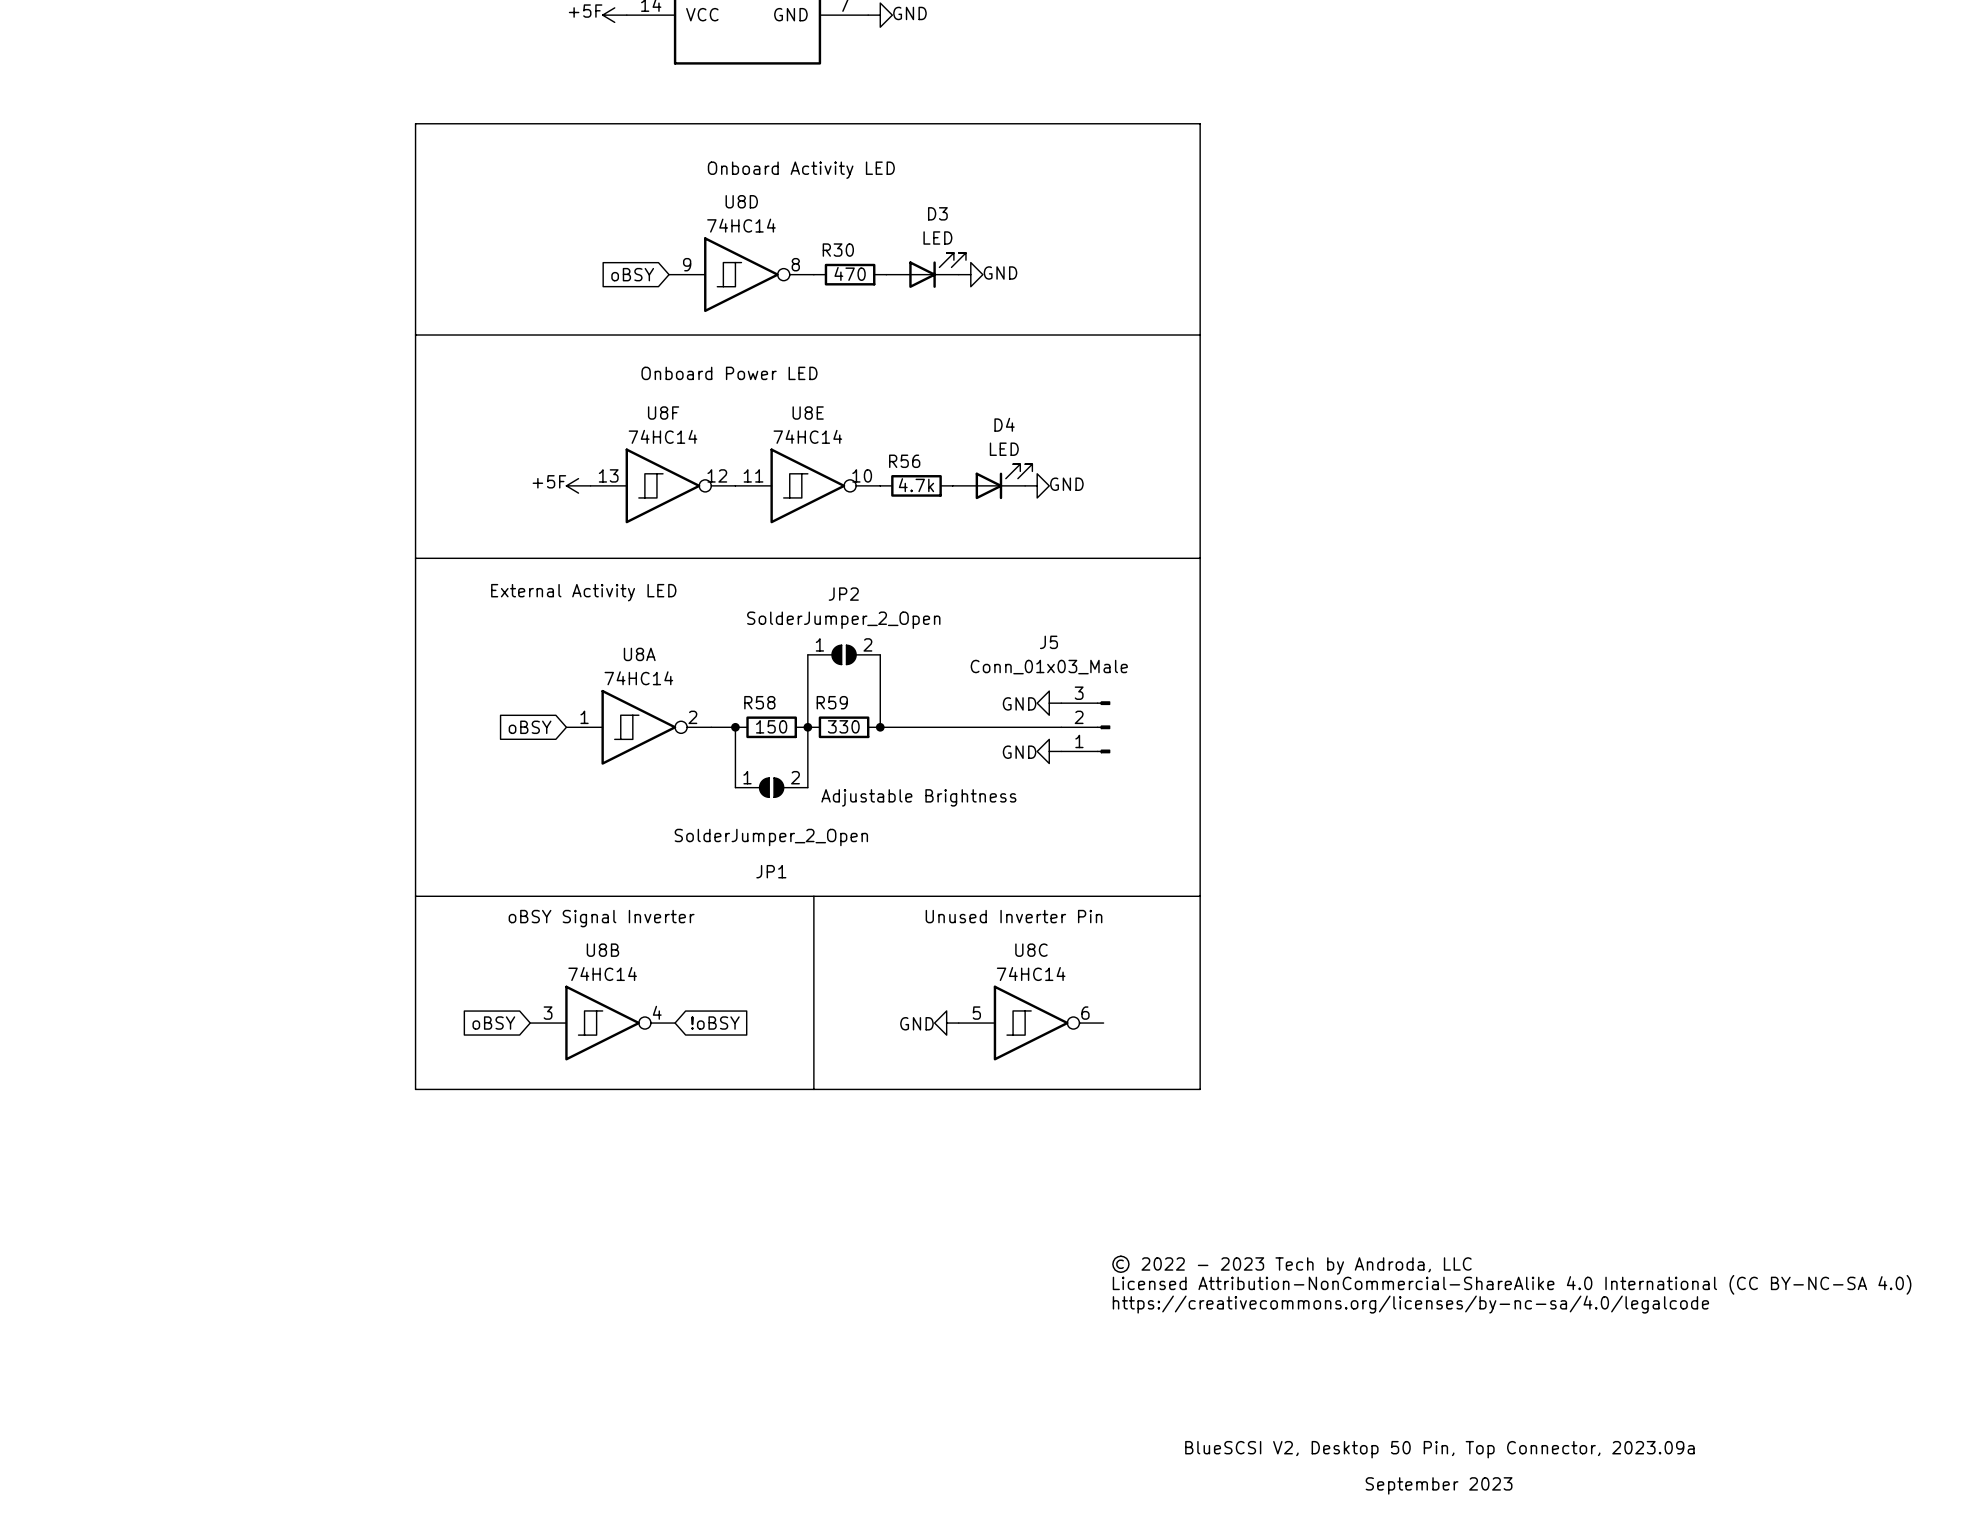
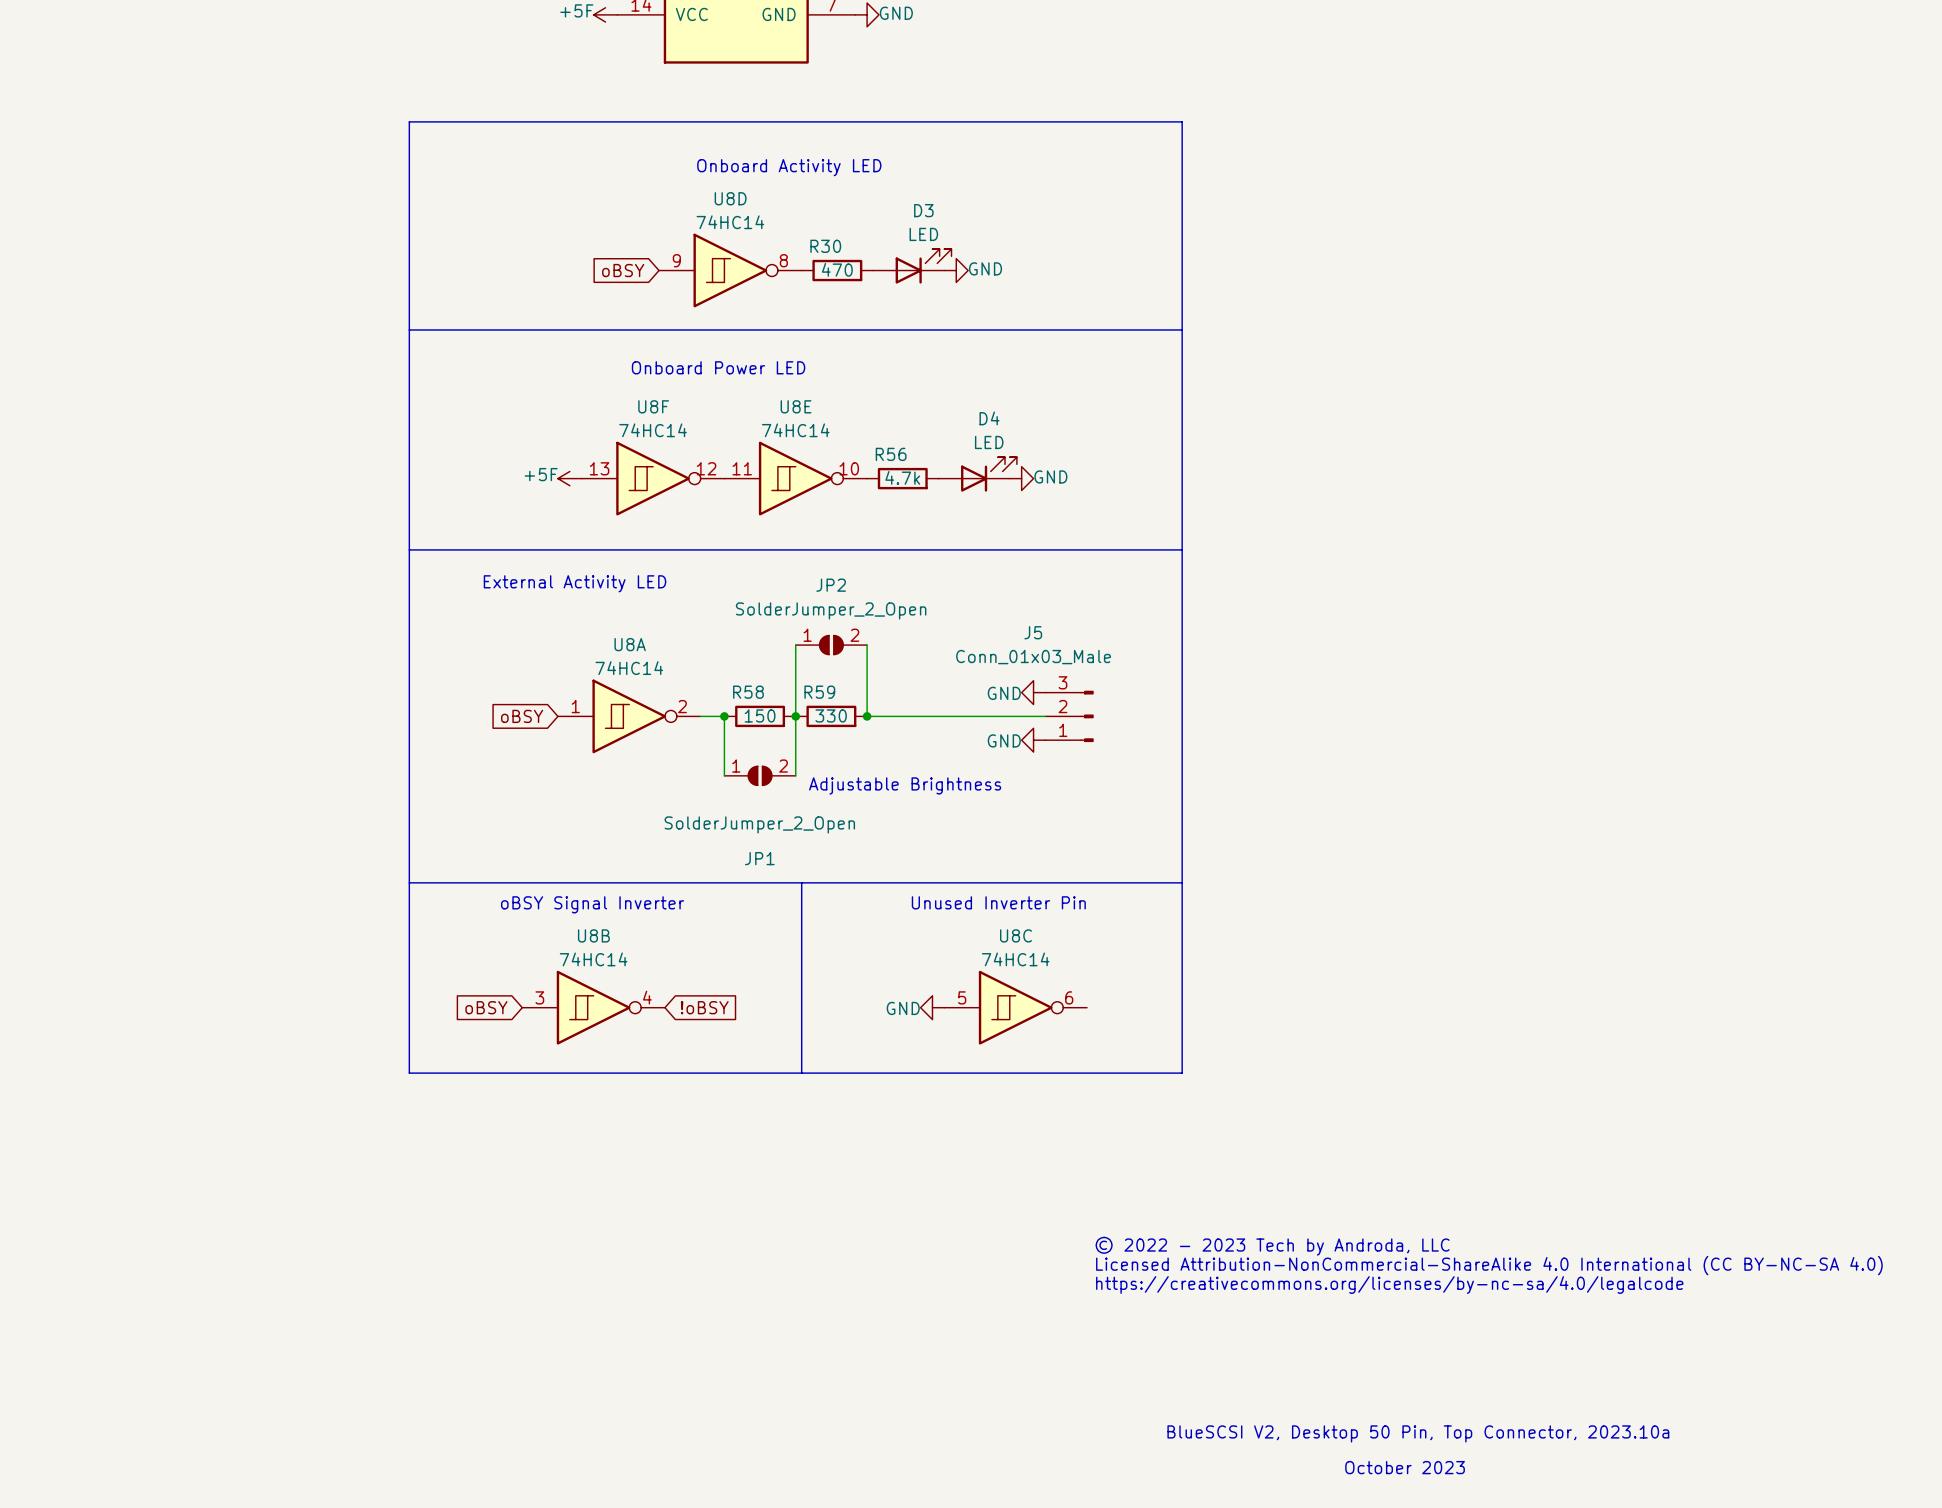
text: BlueSCSI V2, Desktop 50 Pin, Top Connector, 2023.09a (1439, 1449) -> BlueSCSI V2, Desktop 50 Pin, Top Connector, 2023.10a (1418, 1433)
text: September 2023 (1439, 1485) -> October 2023 (1405, 1467)

